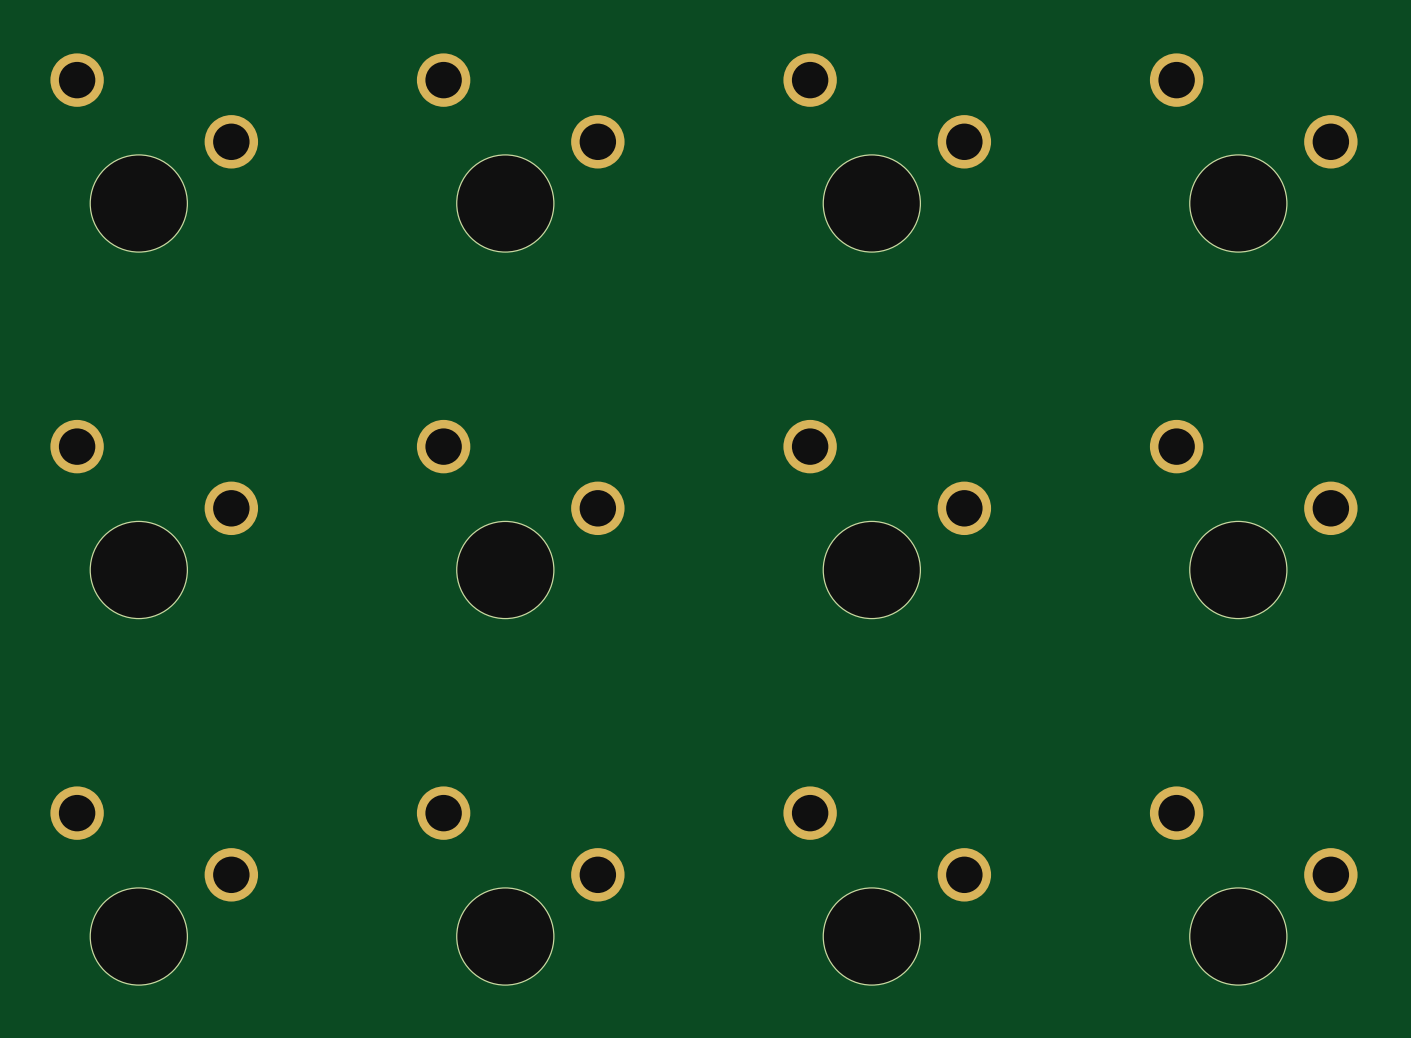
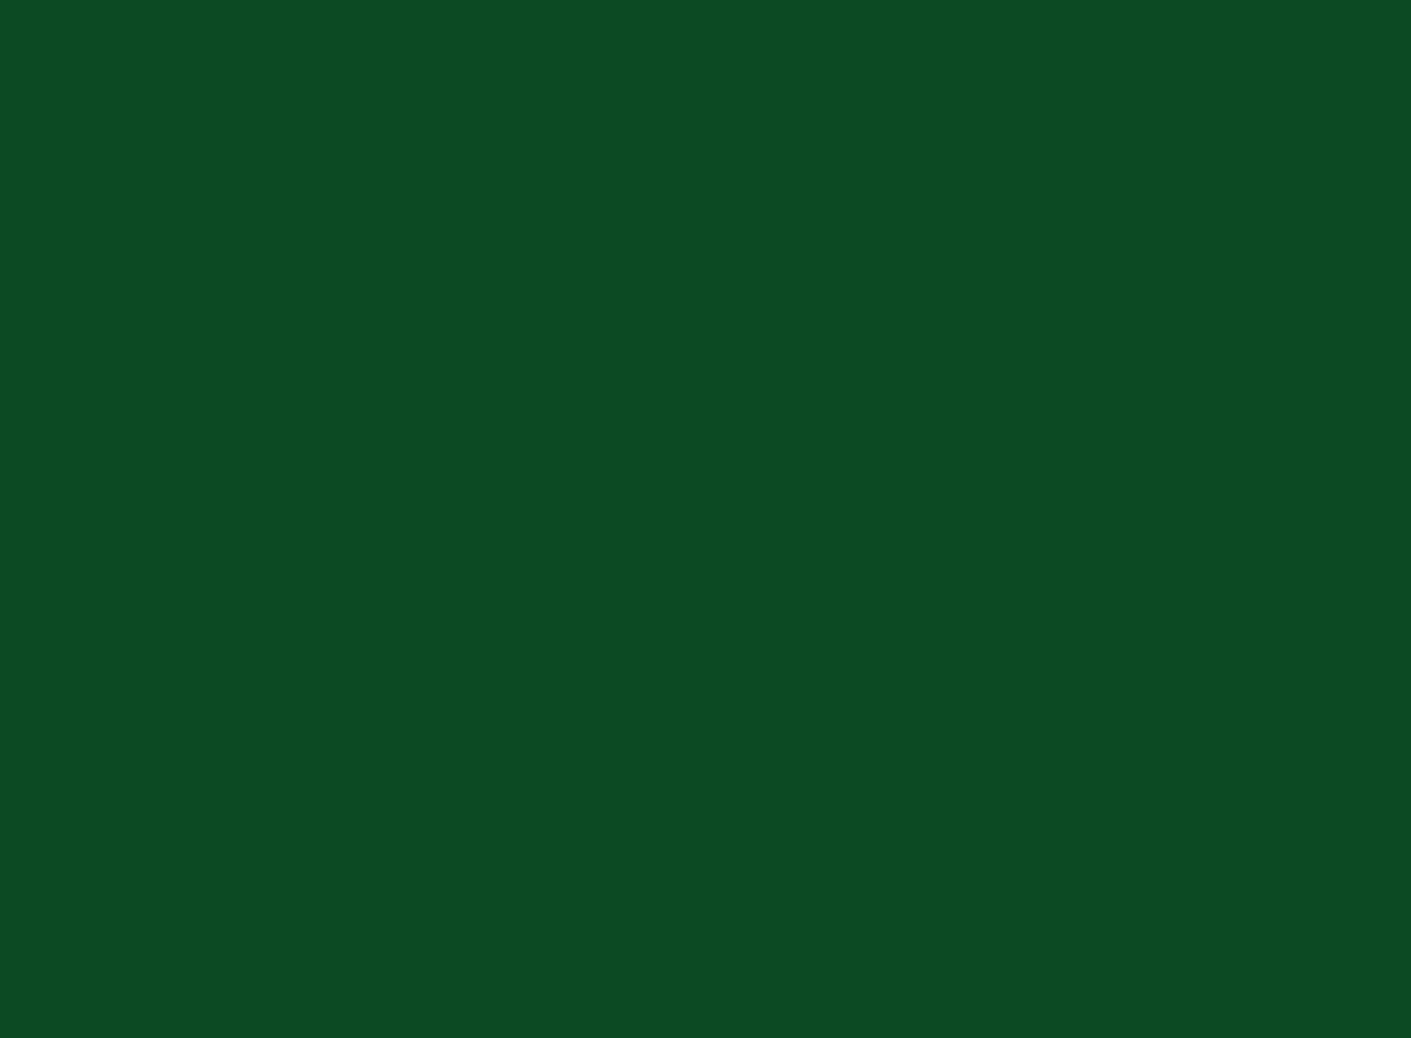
part: (154, 152) -> none
part: (520, 152) -> none
part: (887, 152) -> none
part: (1253, 152) -> none
part: (154, 519) -> none
part: (520, 519) -> none
part: (887, 519) -> none
part: (1253, 519) -> none
part: (154, 885) -> none
part: (520, 885) -> none
part: (887, 885) -> none
part: (1253, 885) -> none

